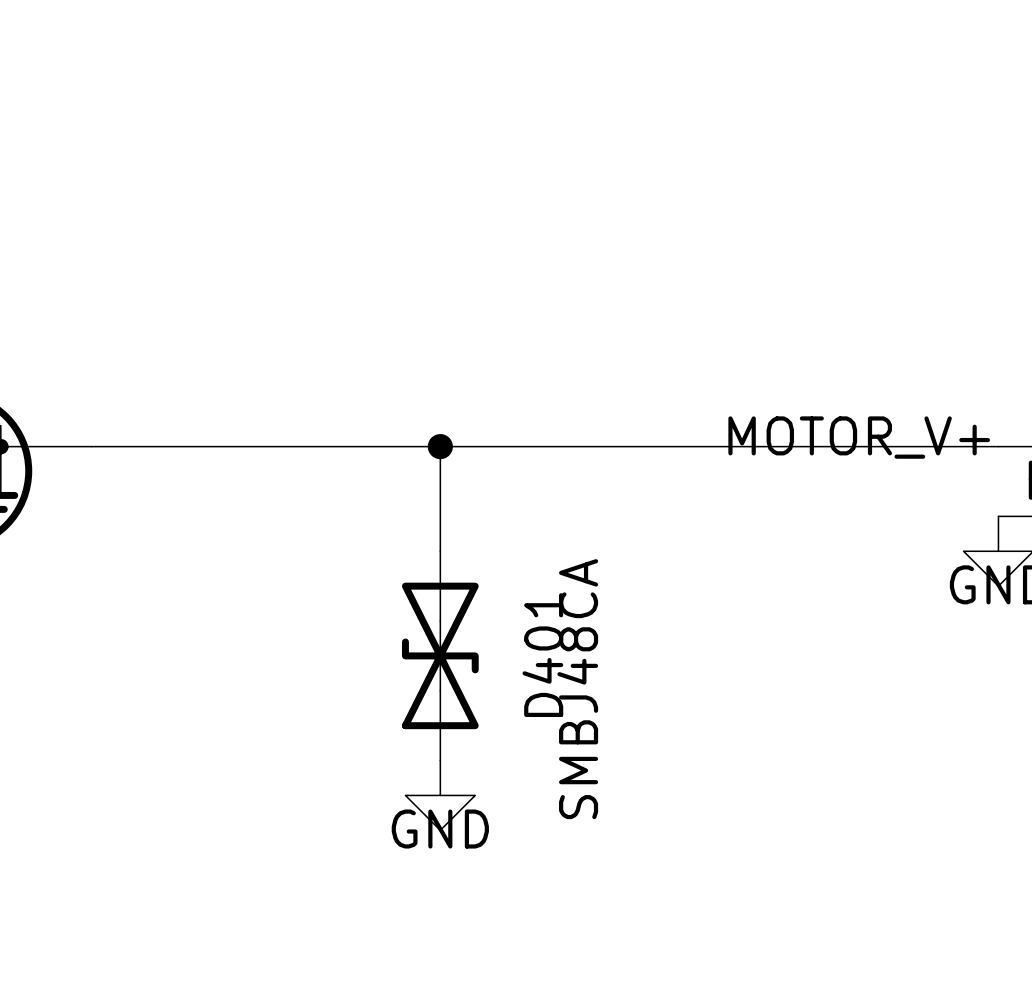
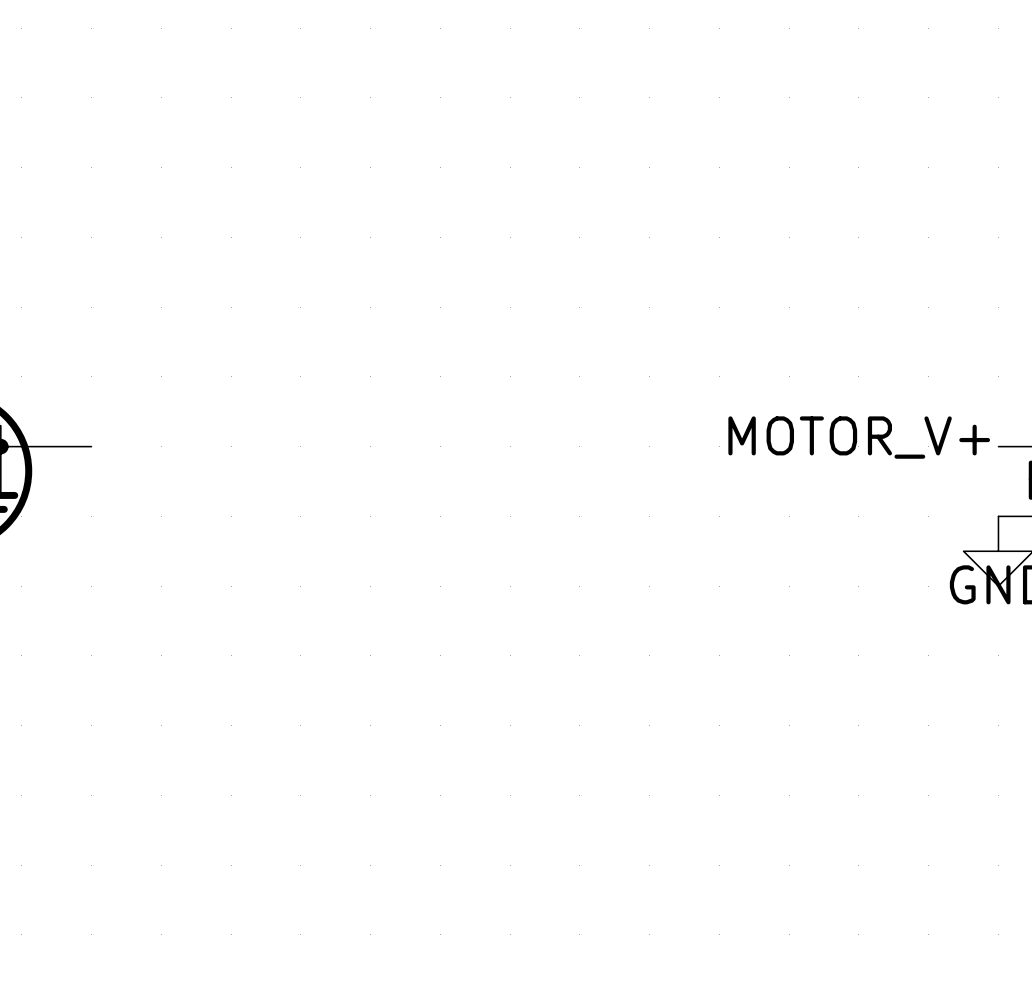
wire: (91, 446) (998, 446) -> none
wire: (440, 446) (440, 551) -> none
junction: (440, 446) -> none
D401: SMBJ48CA (440, 655) -> none
power symbol: GND (440, 795) -> none

